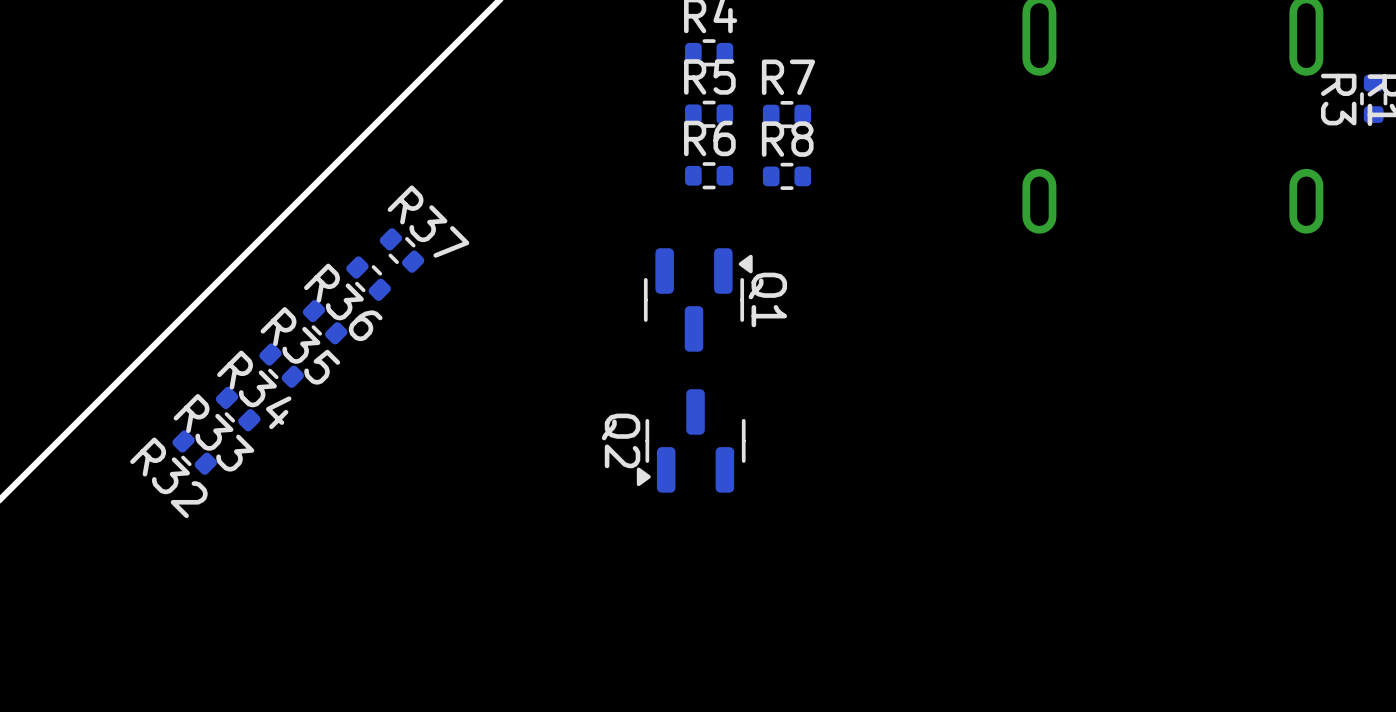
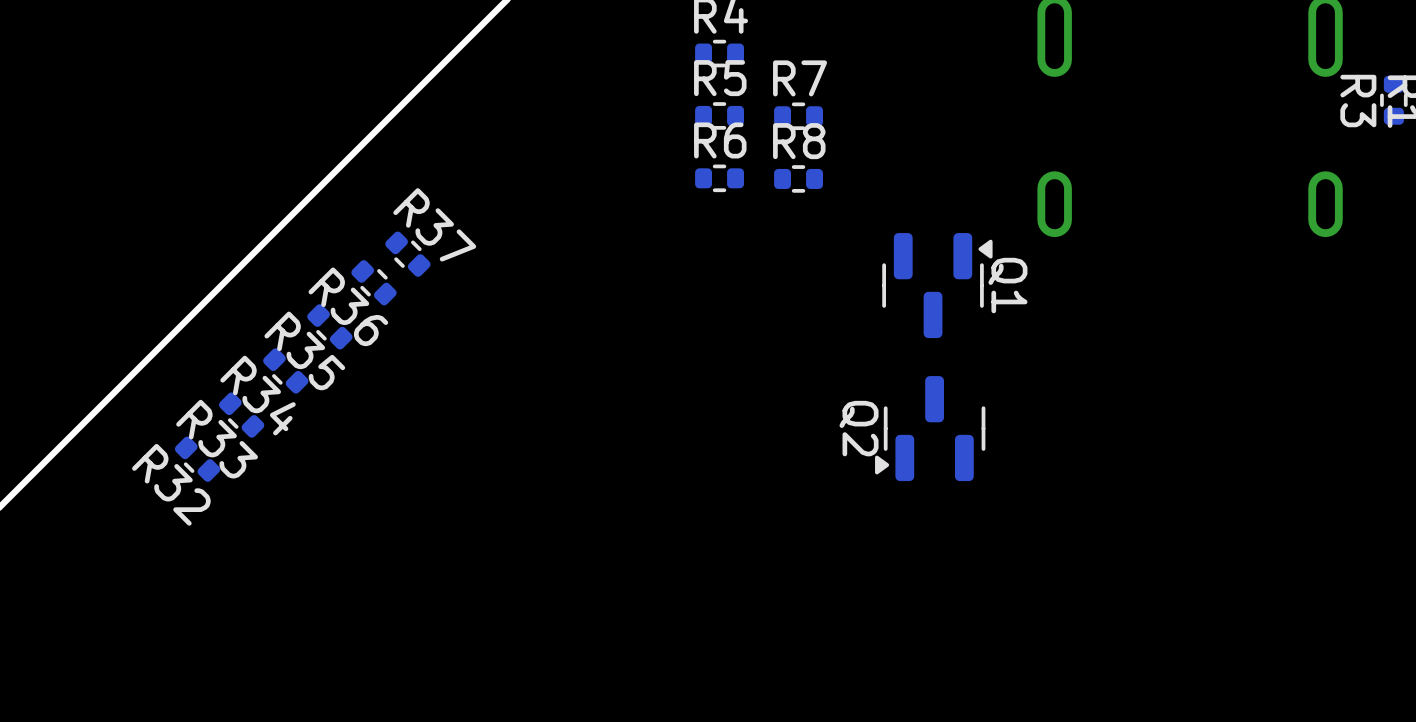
Q1 position: (698, 299) -> (937, 285)
Q2 position: (691, 440) -> (930, 428)

